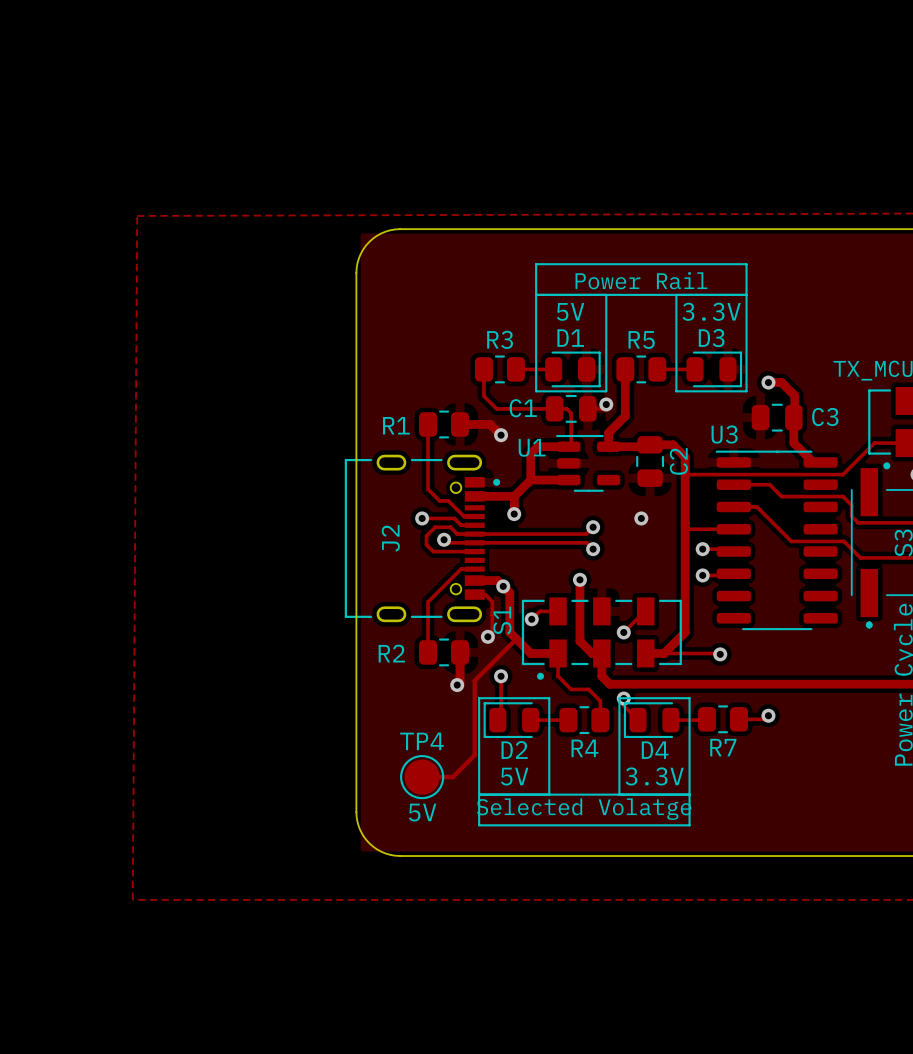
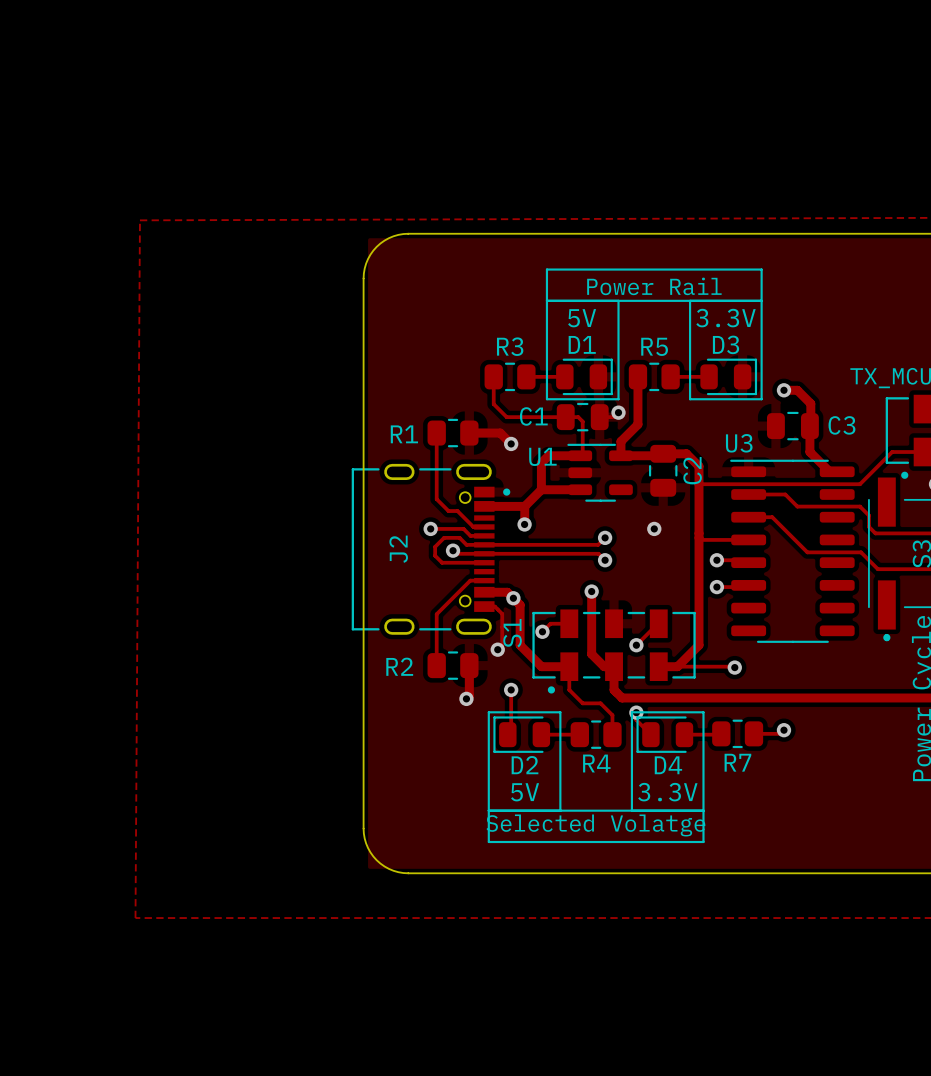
track: (516, 639) (474, 680) (474, 755) (452, 777) (422, 777) -> none
TP4: 5V (422, 777) -> none

